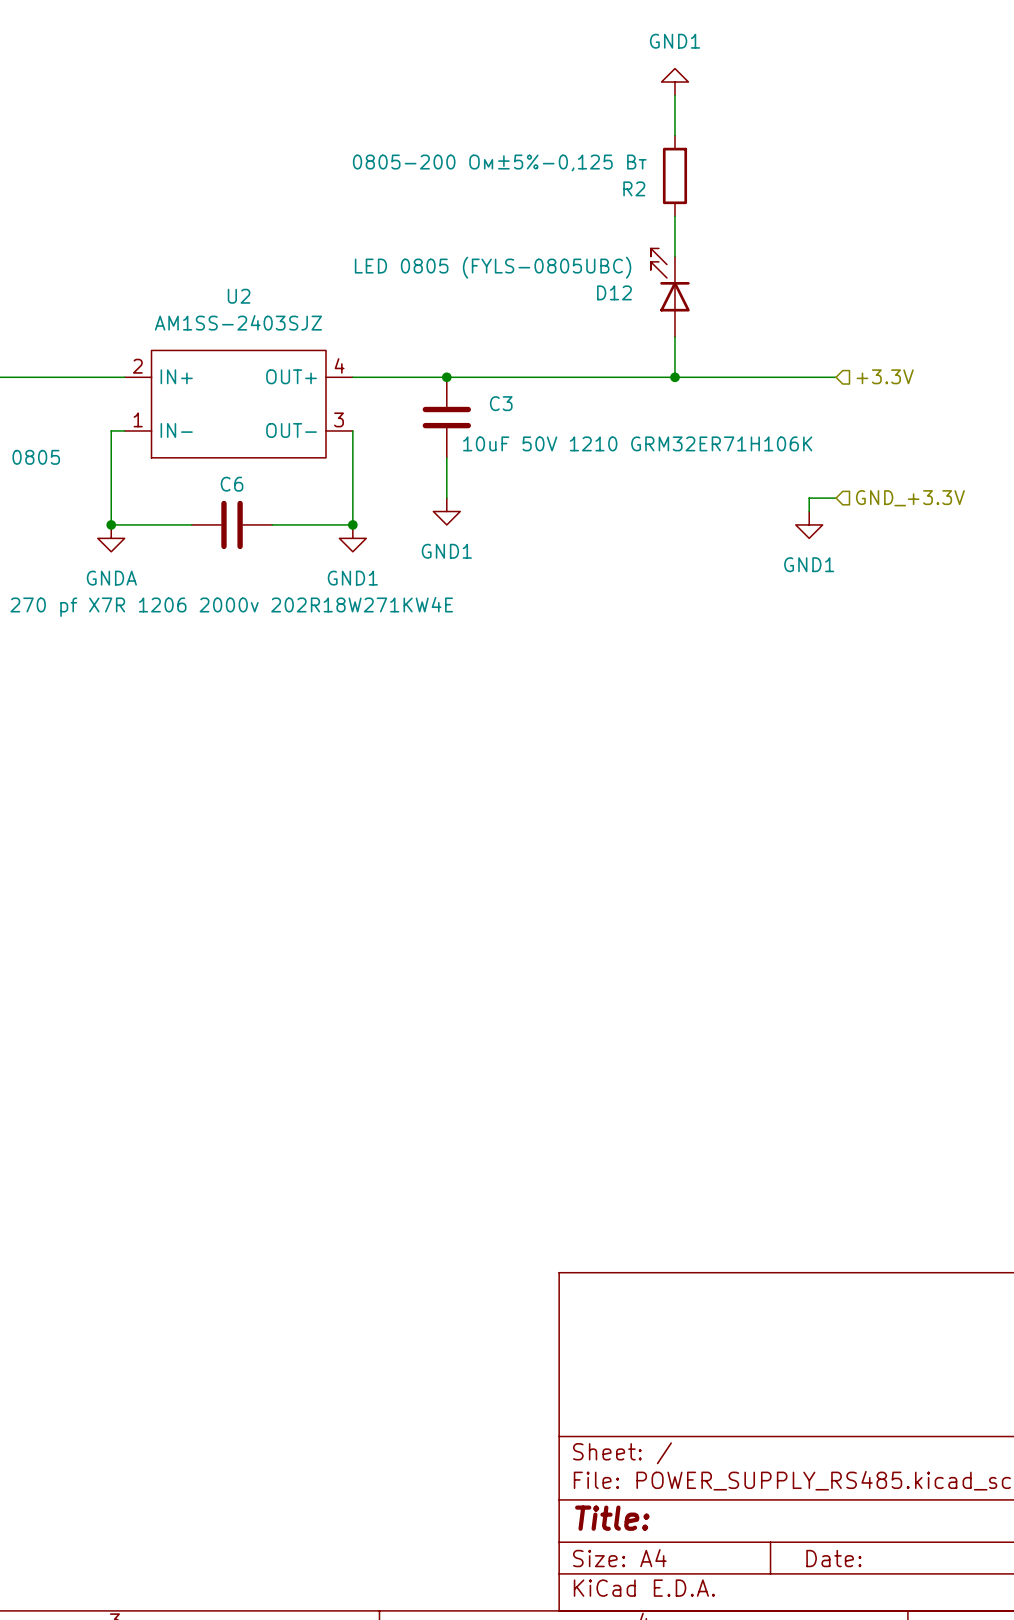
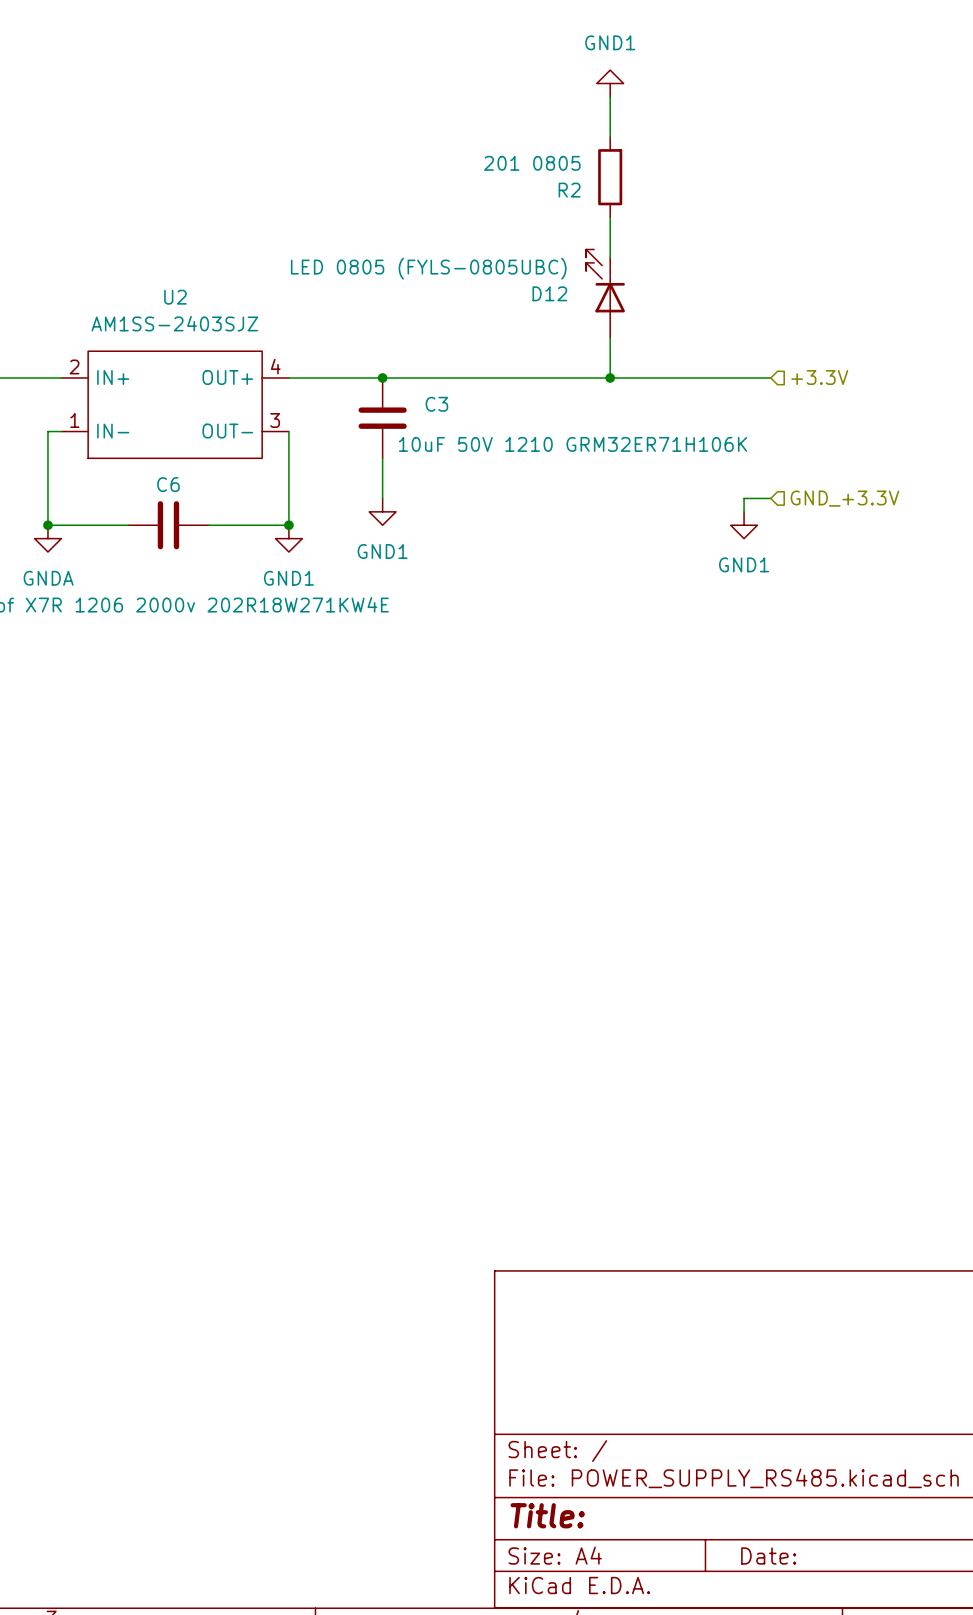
R2 value: 0805-200 Ом±5%-0,125 Вт (499, 162) -> 201 0805 (532, 163)

